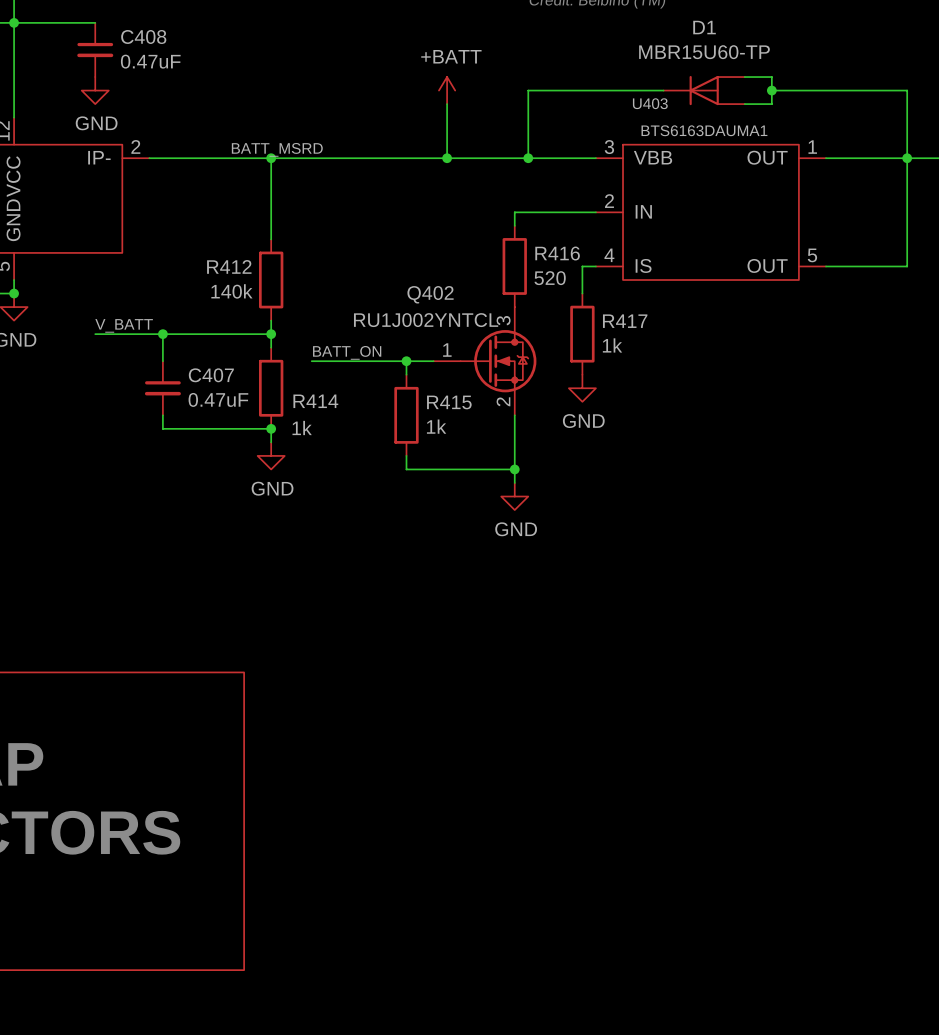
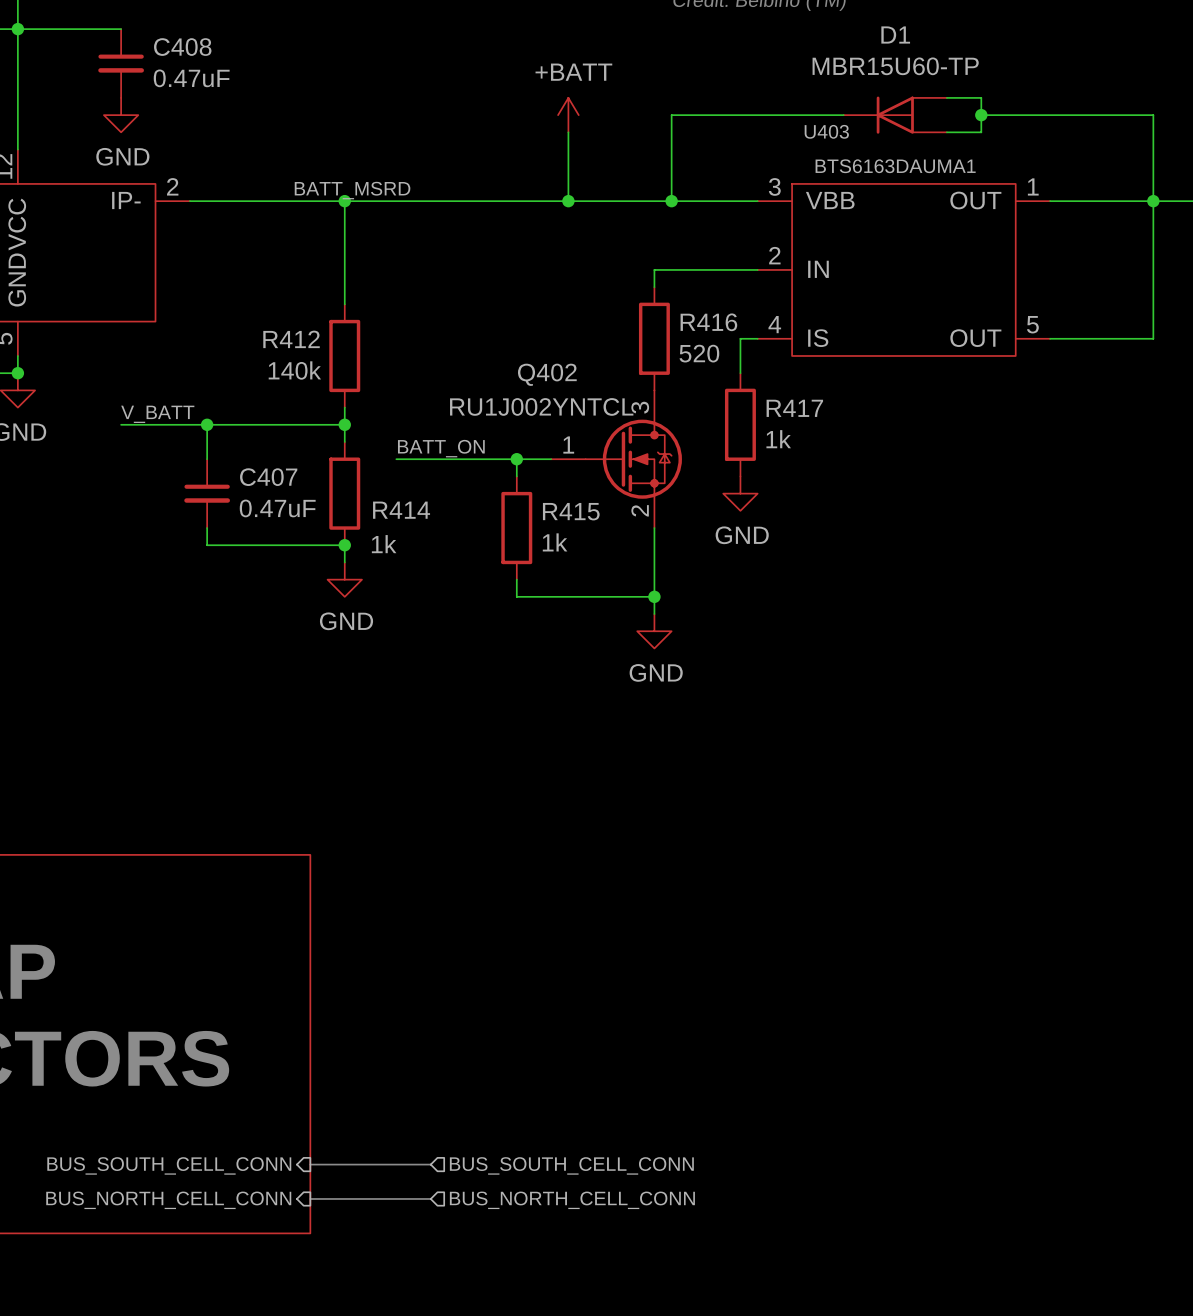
bus: none -> (310, 1164) (430, 1164)
sheet pin: none -> BUS_SOUTH_CELL_CONN (169, 1165)
hierarchical label: none -> BUS_SOUTH_CELL_CONN (571, 1165)
bus: none -> (310, 1198) (430, 1198)
sheet pin: none -> BUS_NORTH_CELL_CONN (168, 1200)
hierarchical label: none -> BUS_NORTH_CELL_CONN (572, 1200)

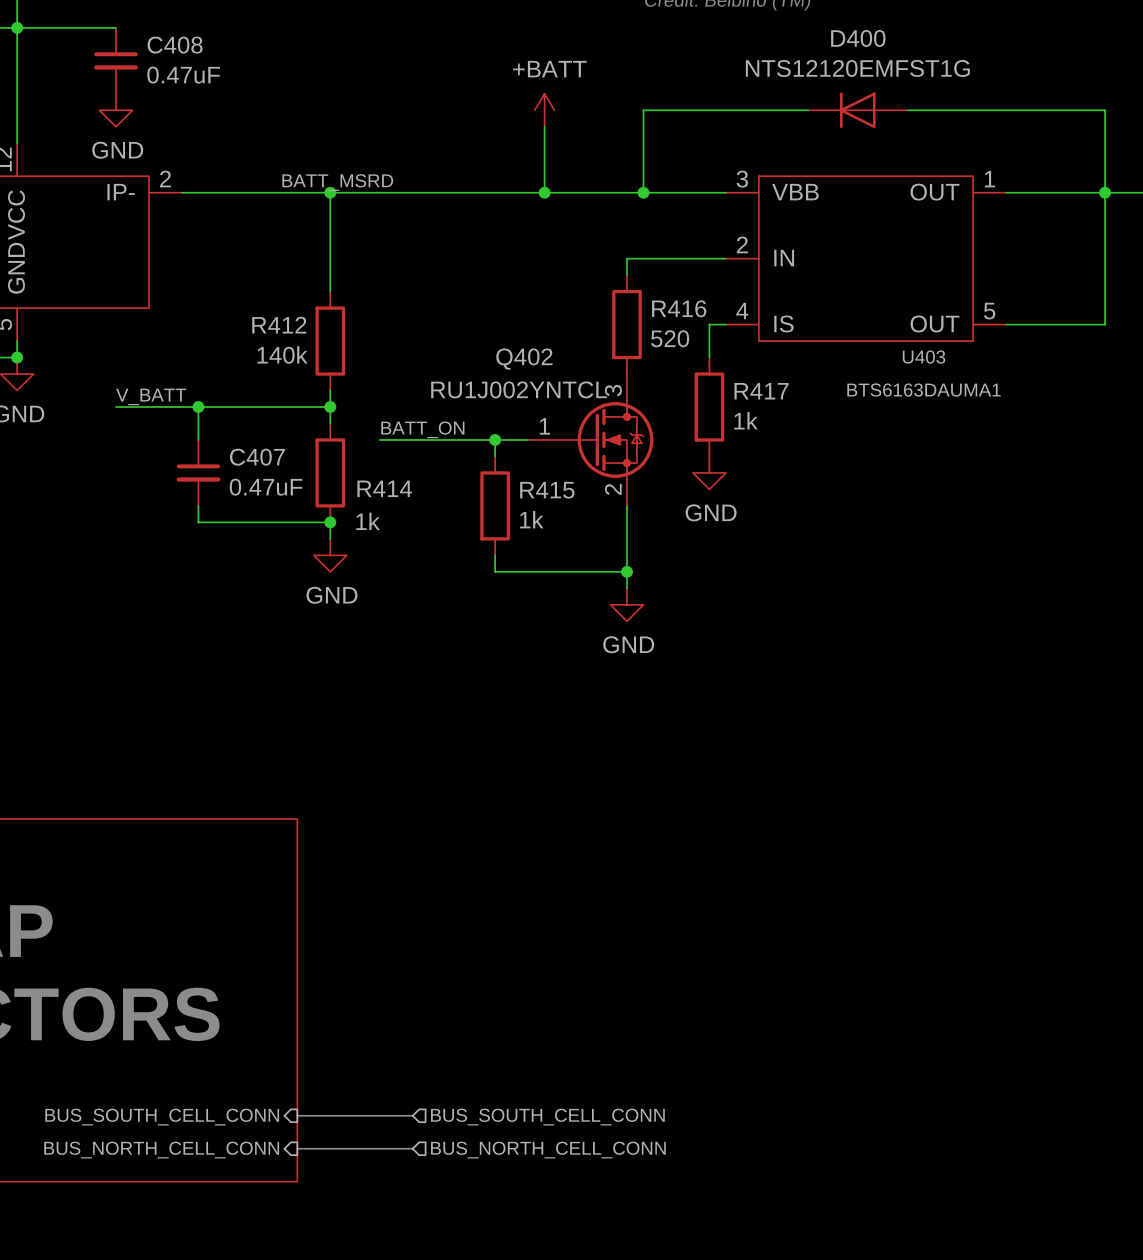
wire: (946, 97) (981, 97) (981, 132) (946, 132) -> none
D1: MBR15U60-TP (895, 115) -> none
D400: none -> NTS12120EMFST1G (857, 110)
wire: none -> (907, 110) (940, 110)
junction: (981, 115) -> none
U403 name position: U403 (826, 131) -> U403 (924, 357)
U403 value position: BTS6163DAUMA1 (895, 166) -> BTS6163DAUMA1 (924, 390)

